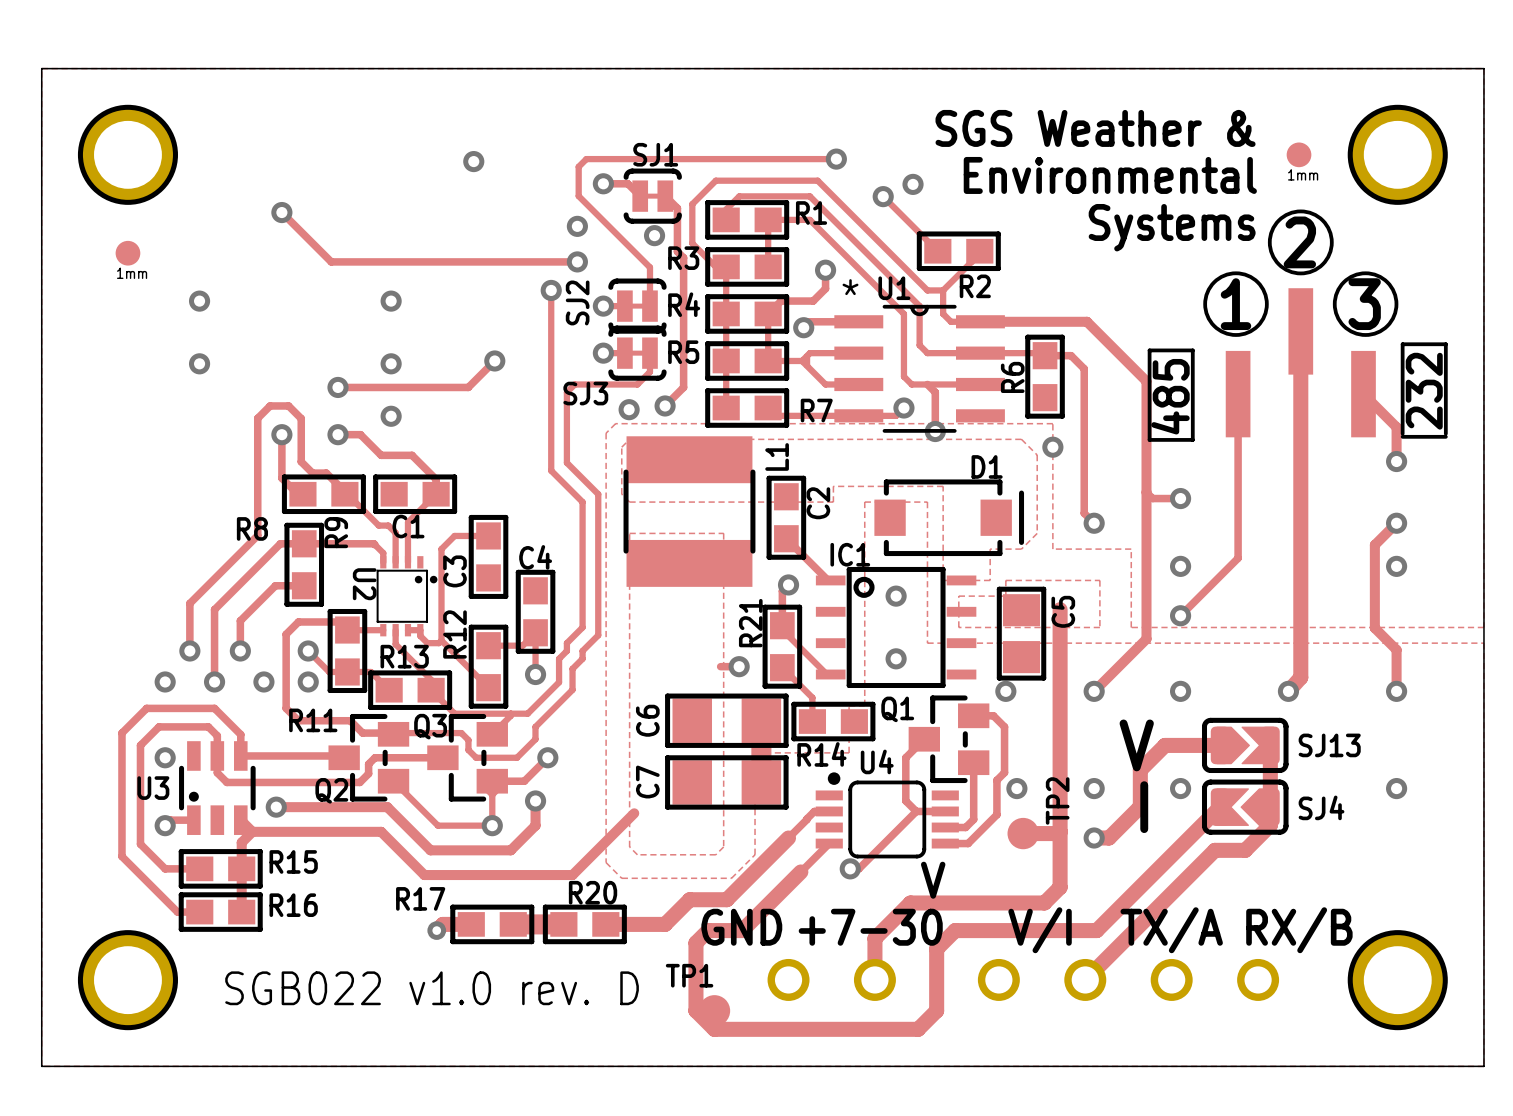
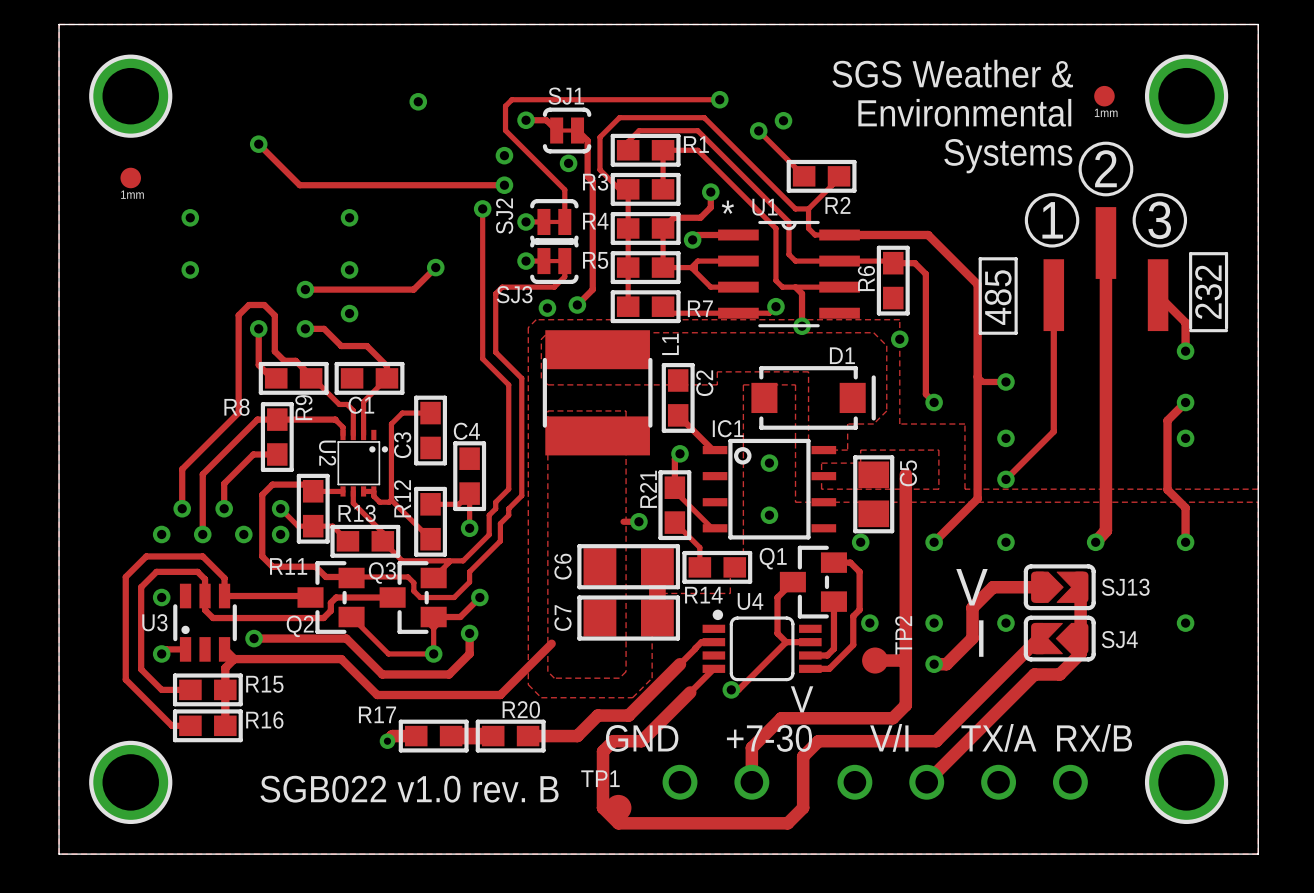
text: SGB022 v1.0 rev. D (432, 988) -> SGB022 v1.0 rev. B (409, 789)

